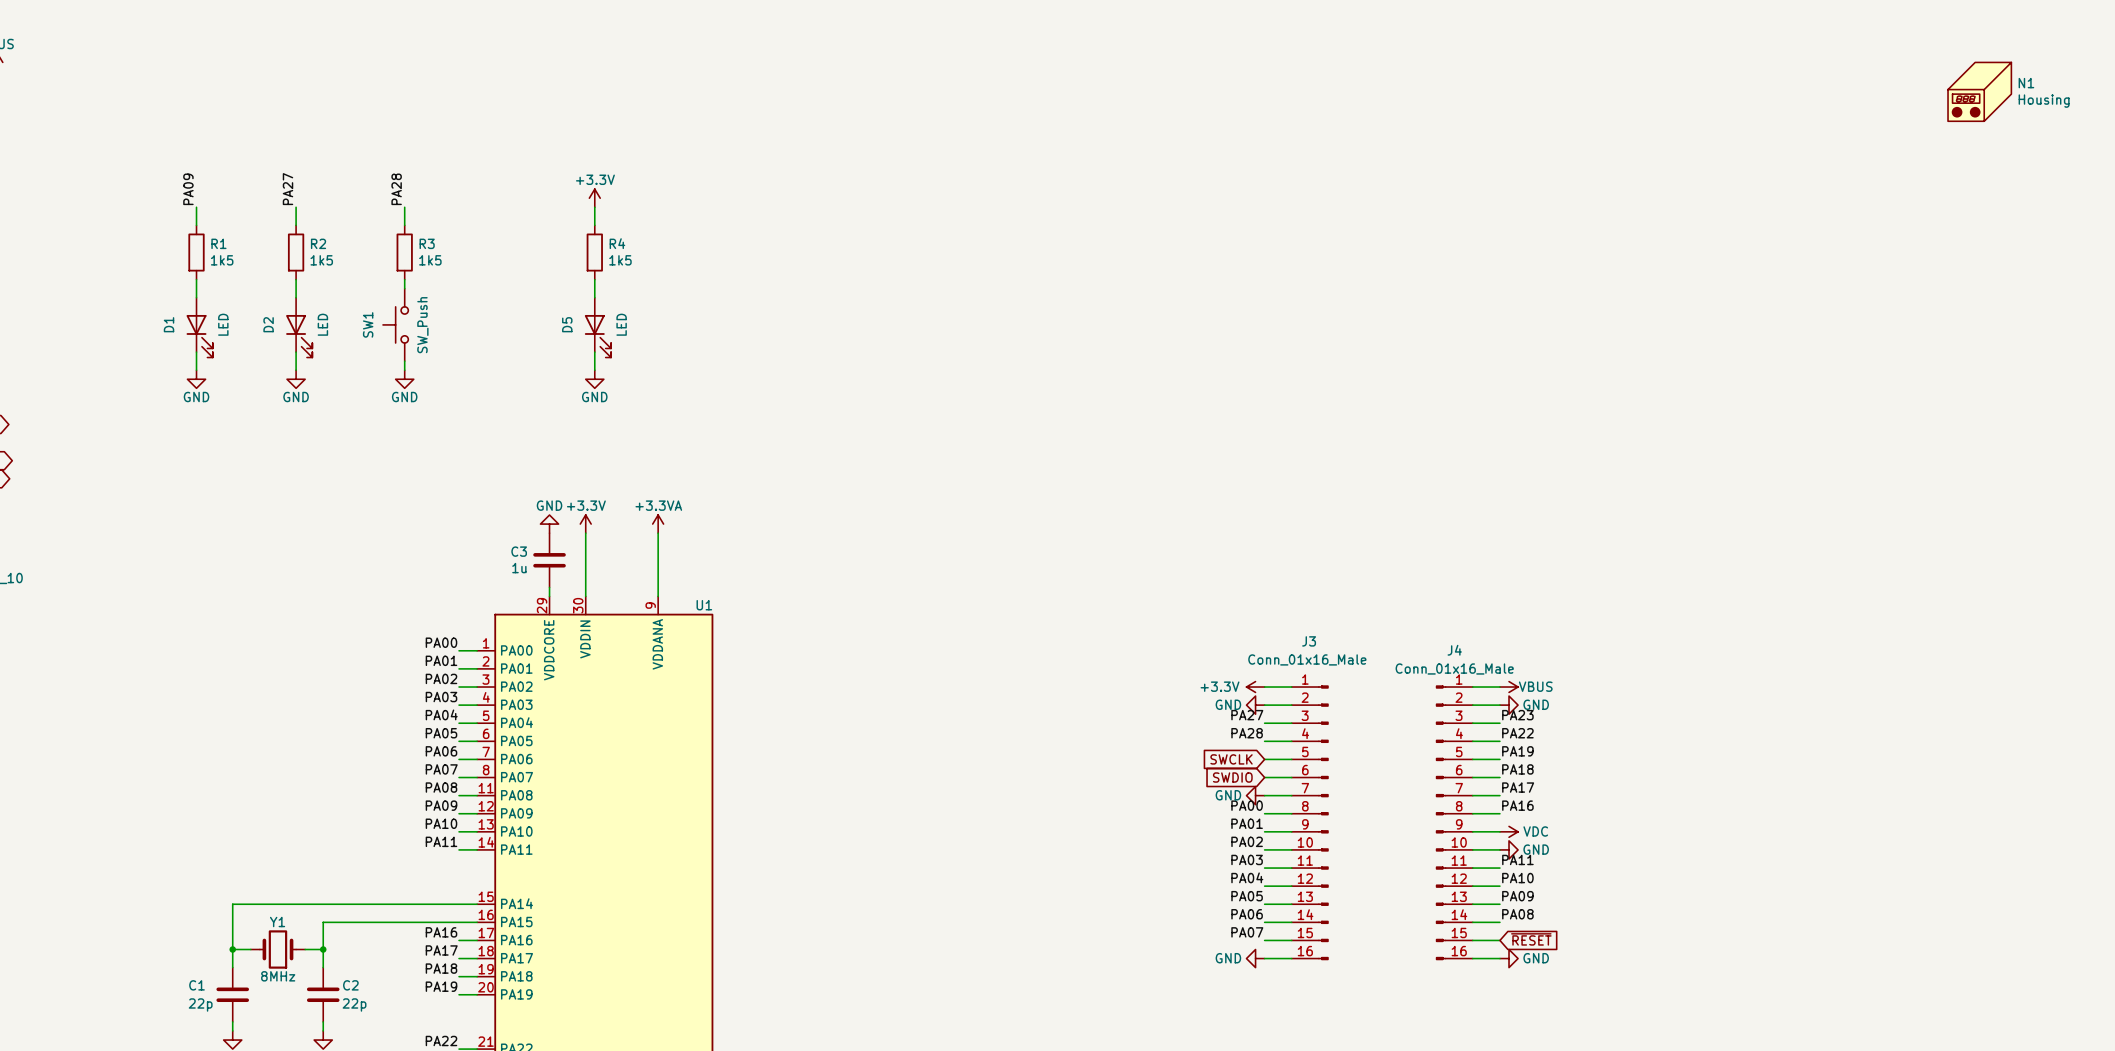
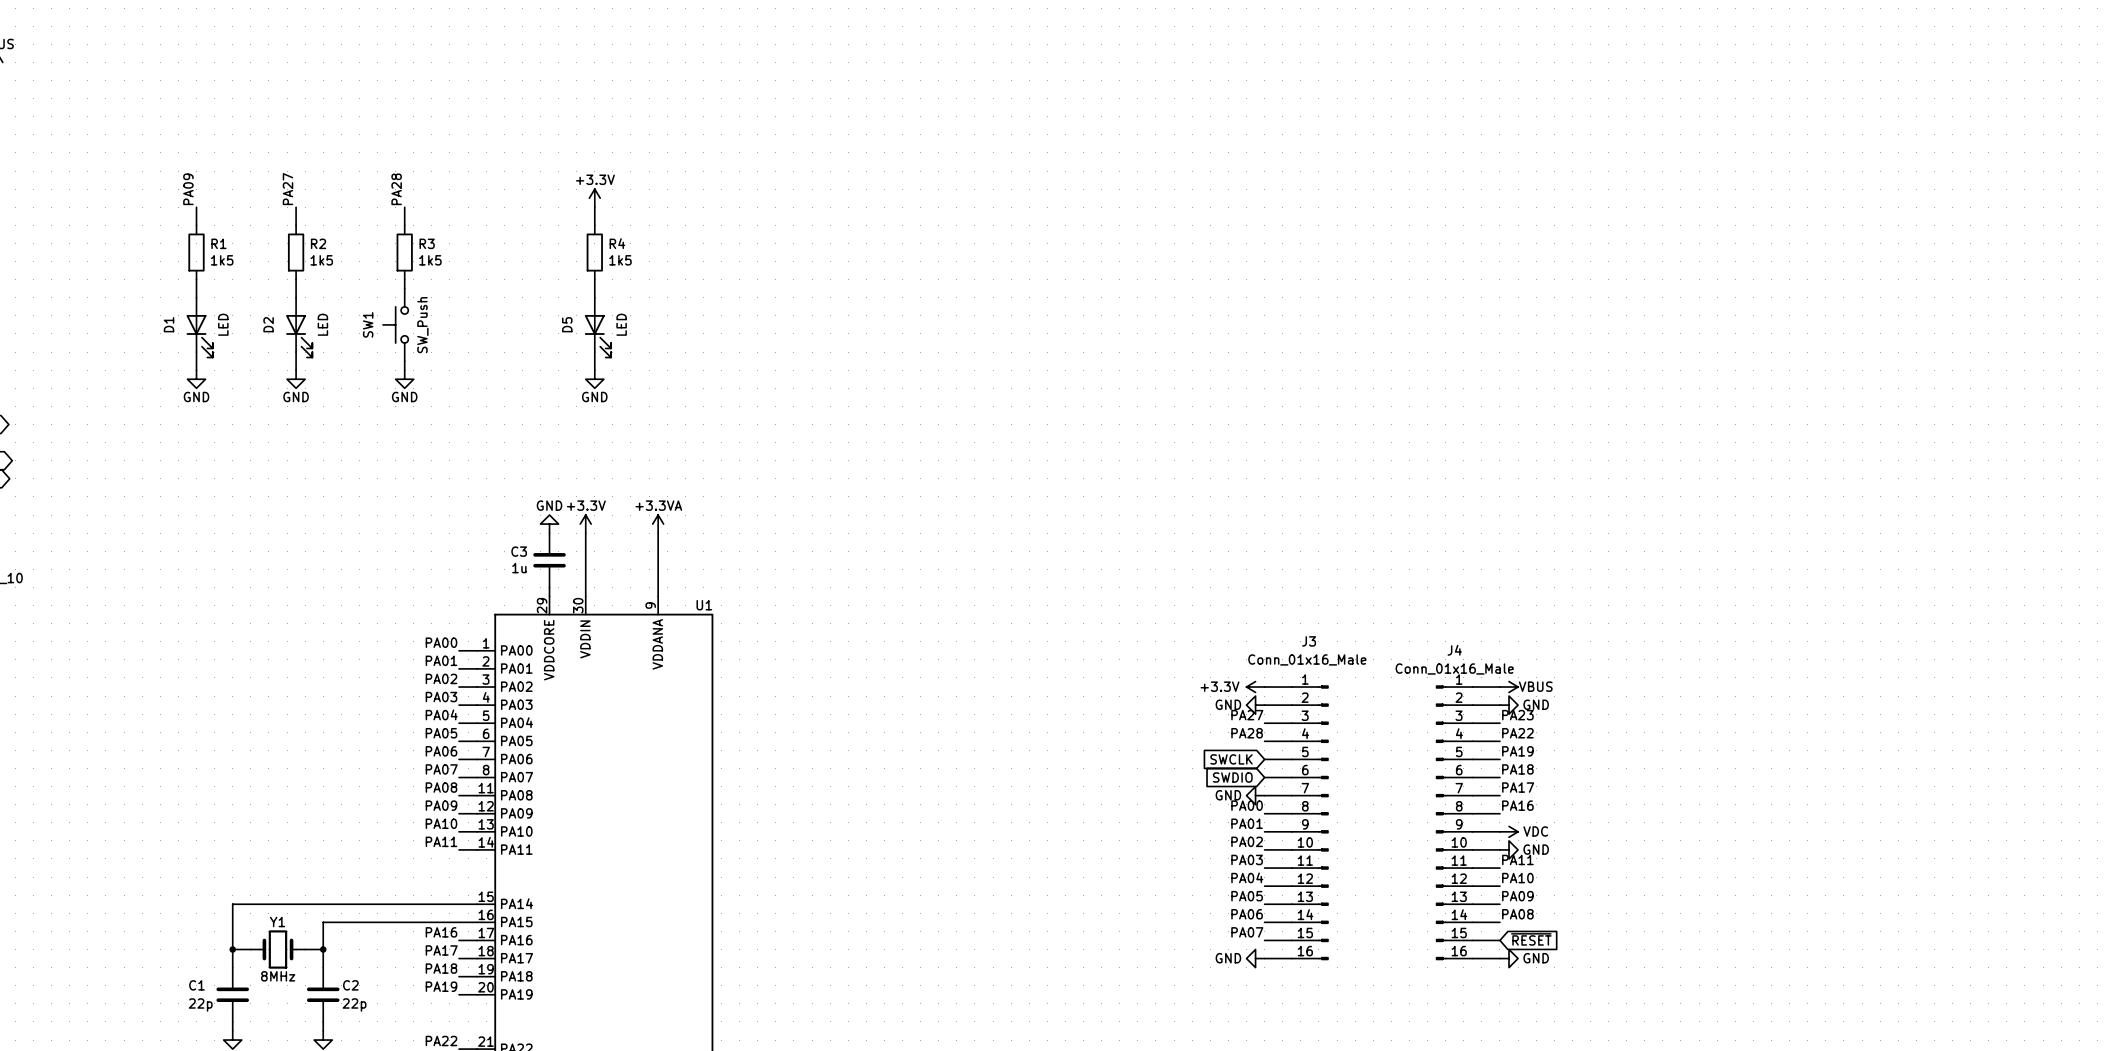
N1: Housing (1979, 91) -> none

